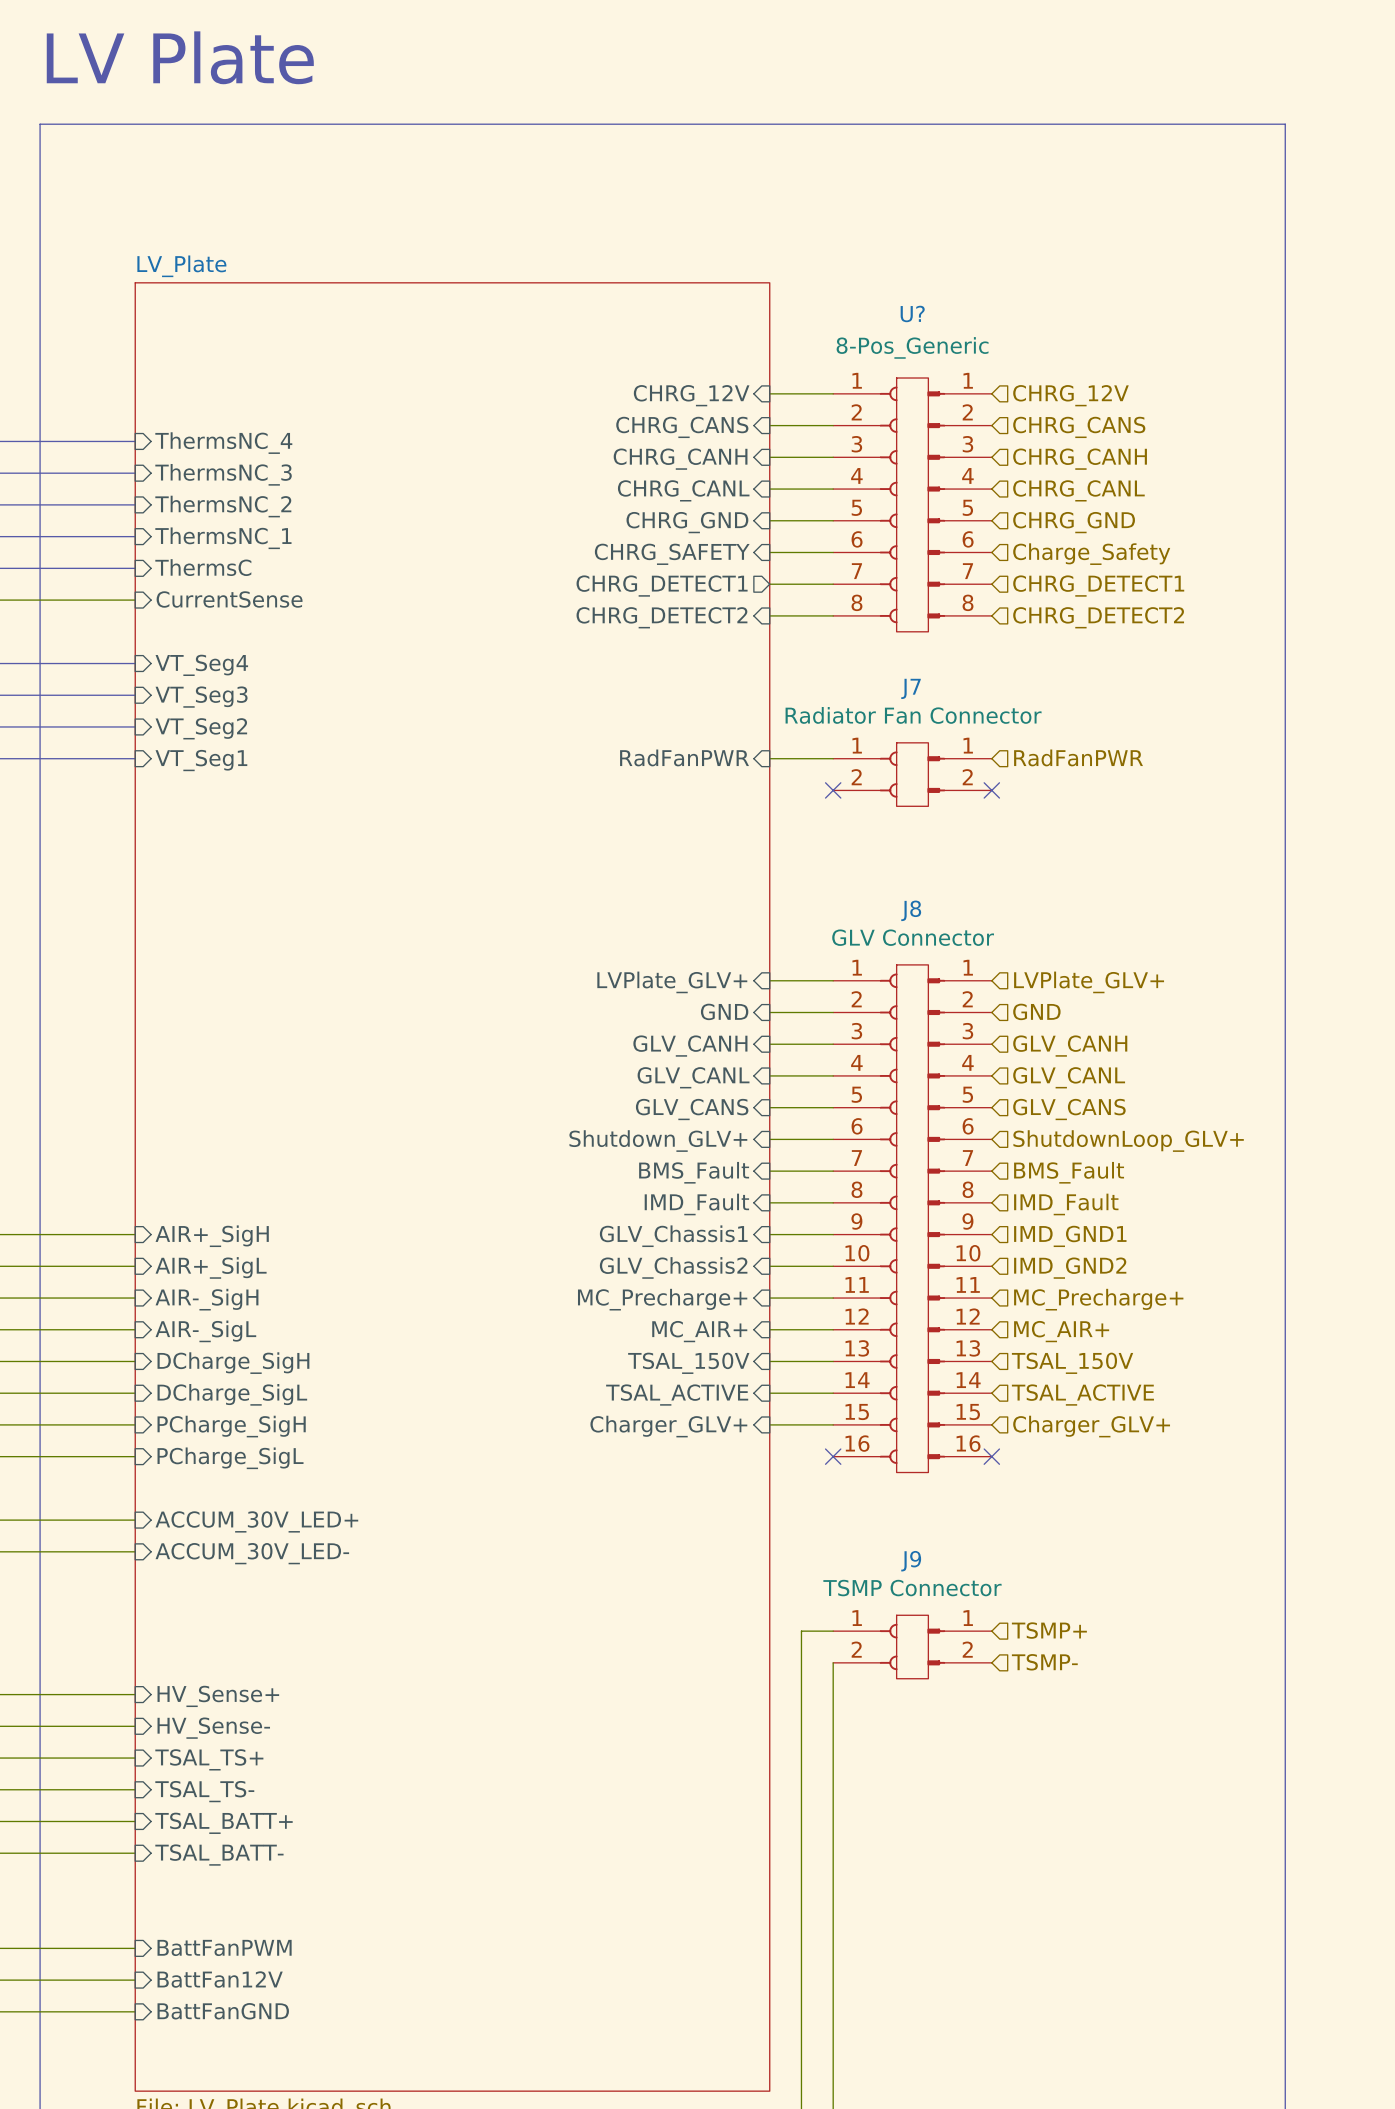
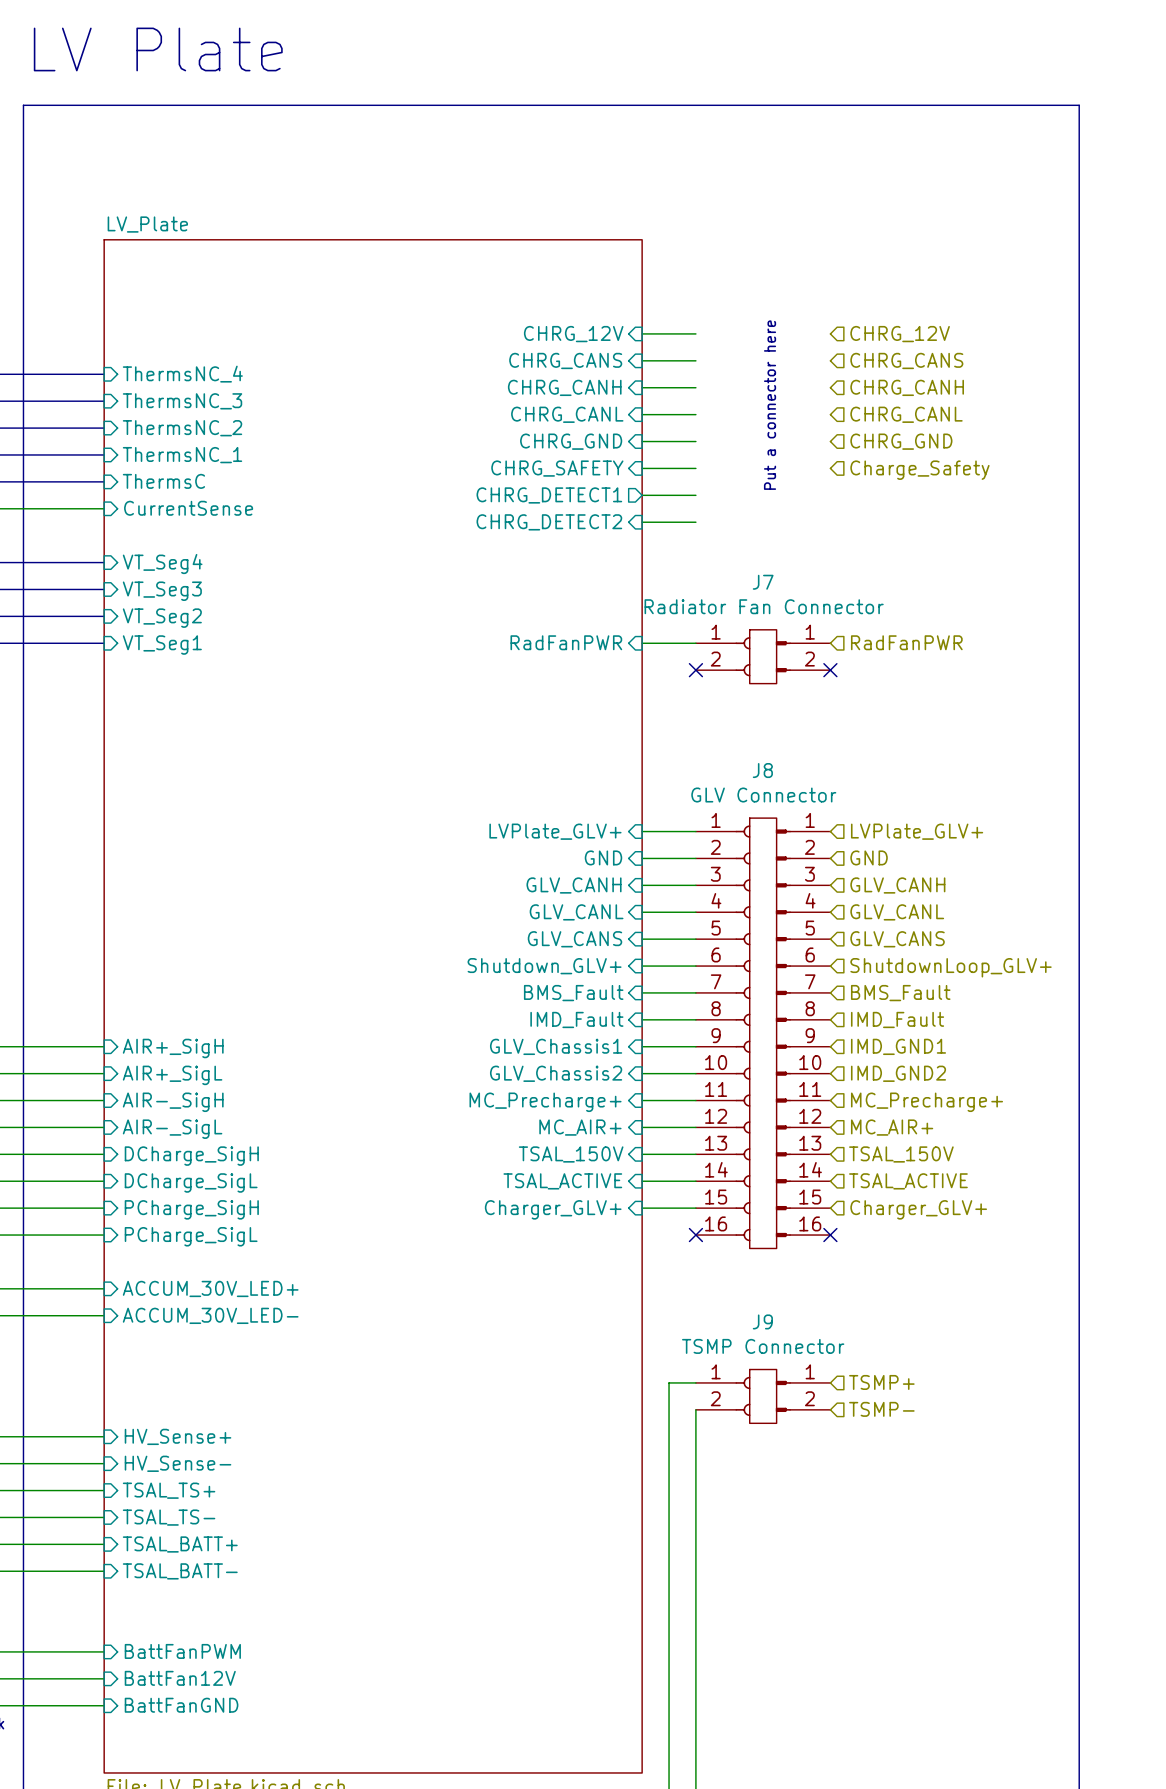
text: none -> Put a connector here (770, 405)
U?: 8-Pos_Generic (912, 504) -> none
hierarchical label: CHRG_DETECT1 (1098, 586) -> none
hierarchical label: CHRG_DETECT2 (1098, 617) -> none

